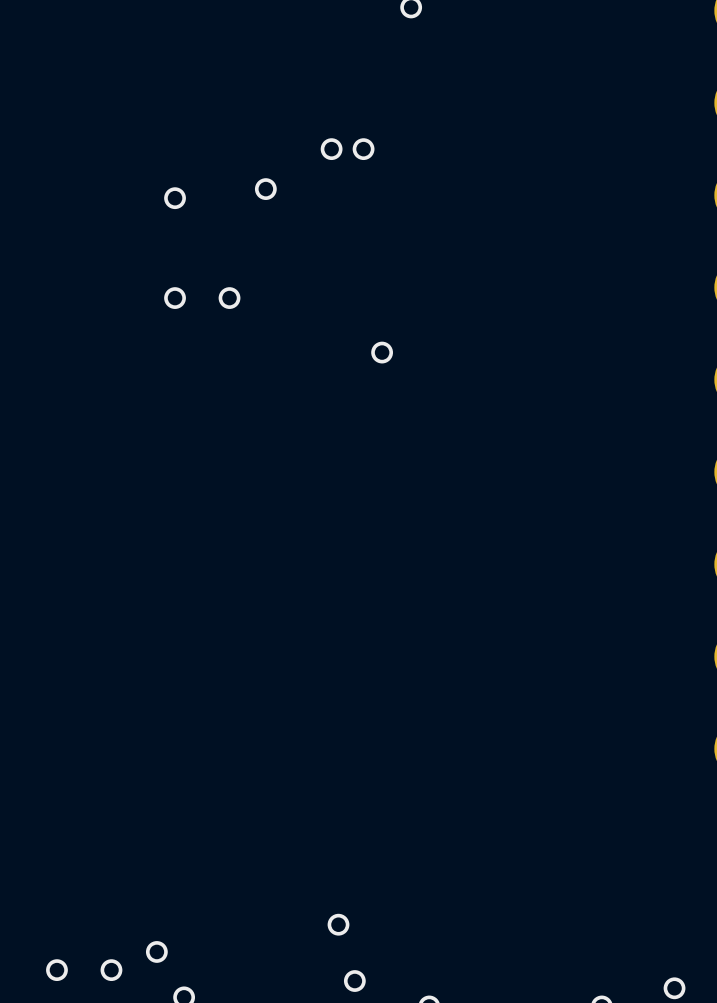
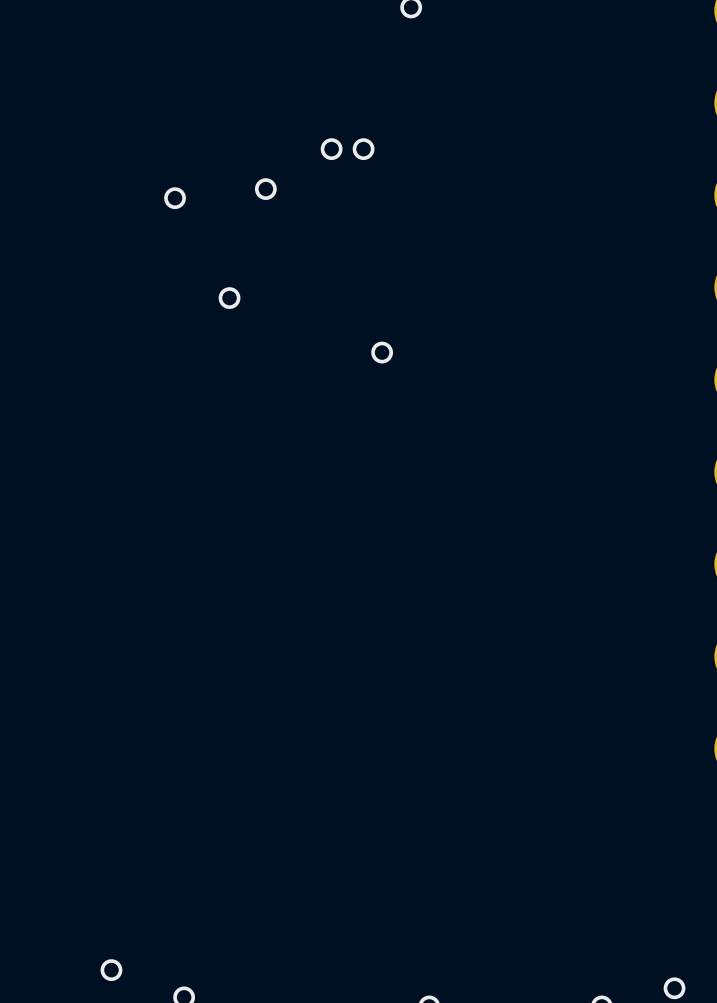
via: (175, 298) -> none
via: (338, 924) -> none
via: (156, 951) -> none
via: (56, 970) -> none
via: (354, 981) -> none

